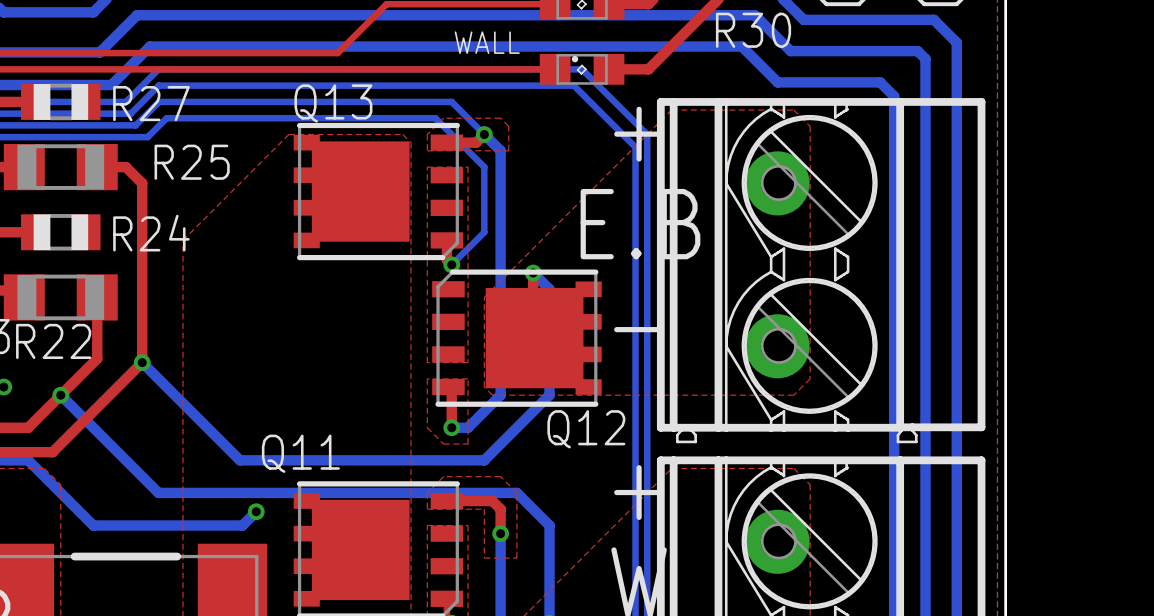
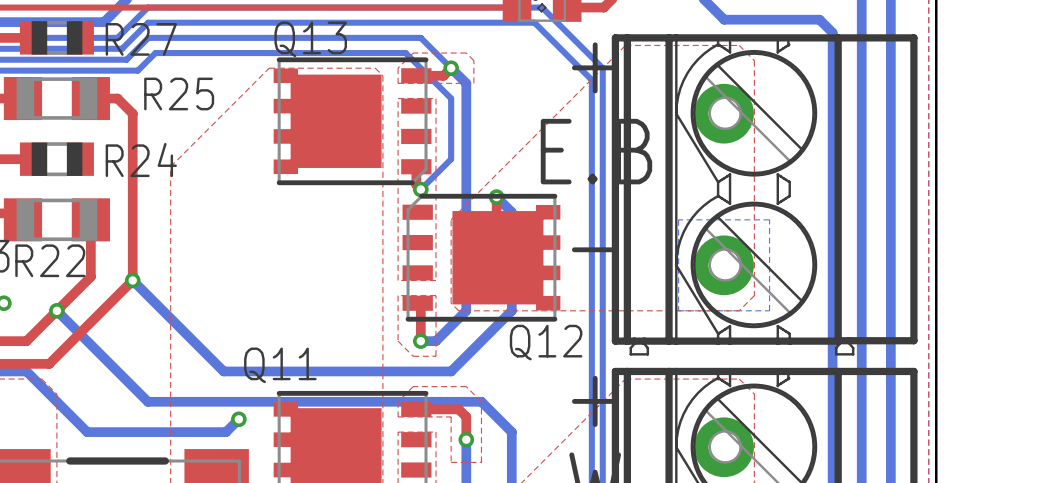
bottom zone outline: none -> (678, 219) (678, 310) (769, 310) (769, 219) (678, 219)

